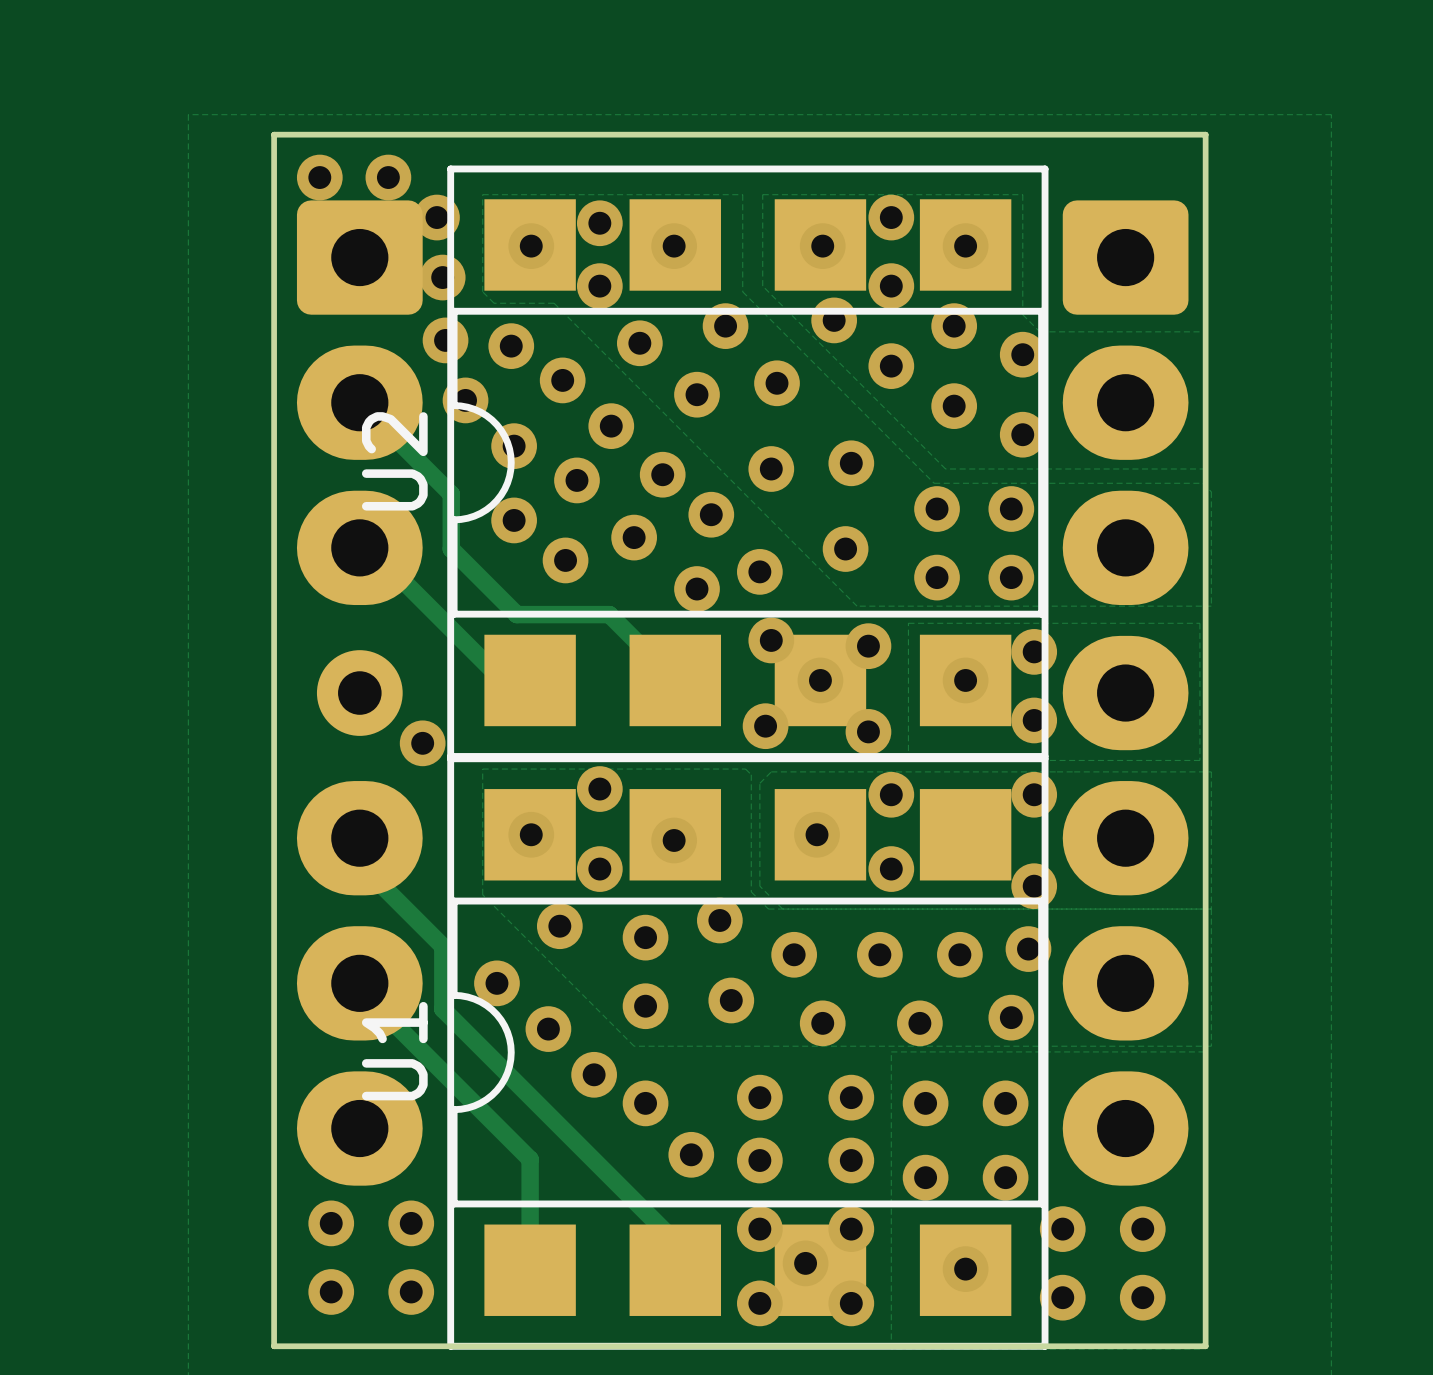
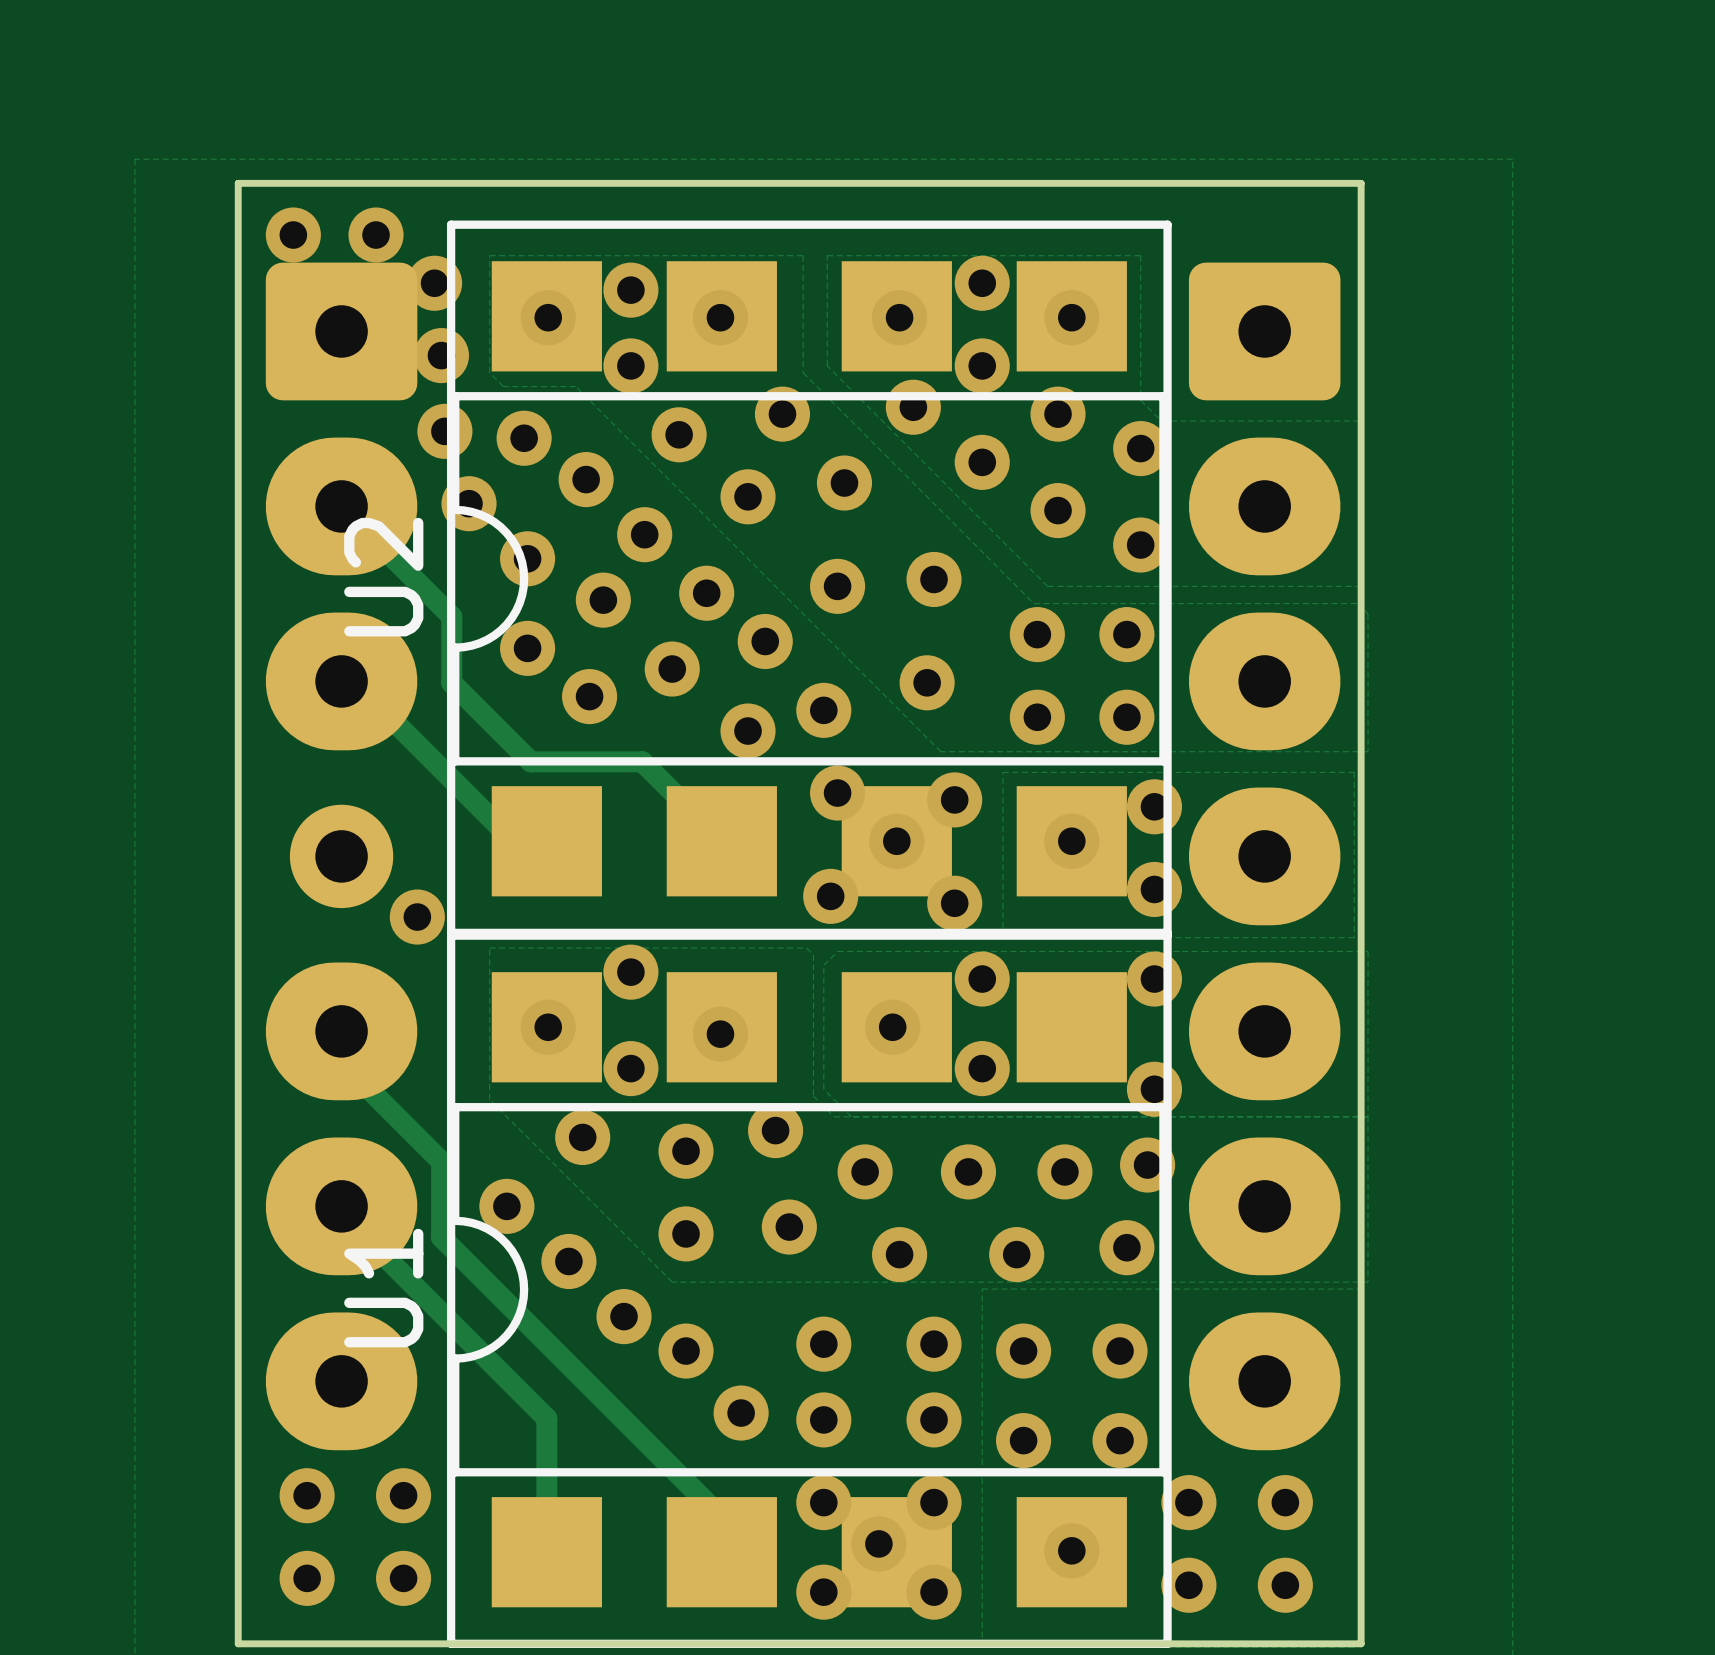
part footprint: [296, 200, 423, 1186] -> [265, 262, 418, 1451]
part footprint: [1062, 200, 1189, 1186] -> [1188, 262, 1341, 1451]

